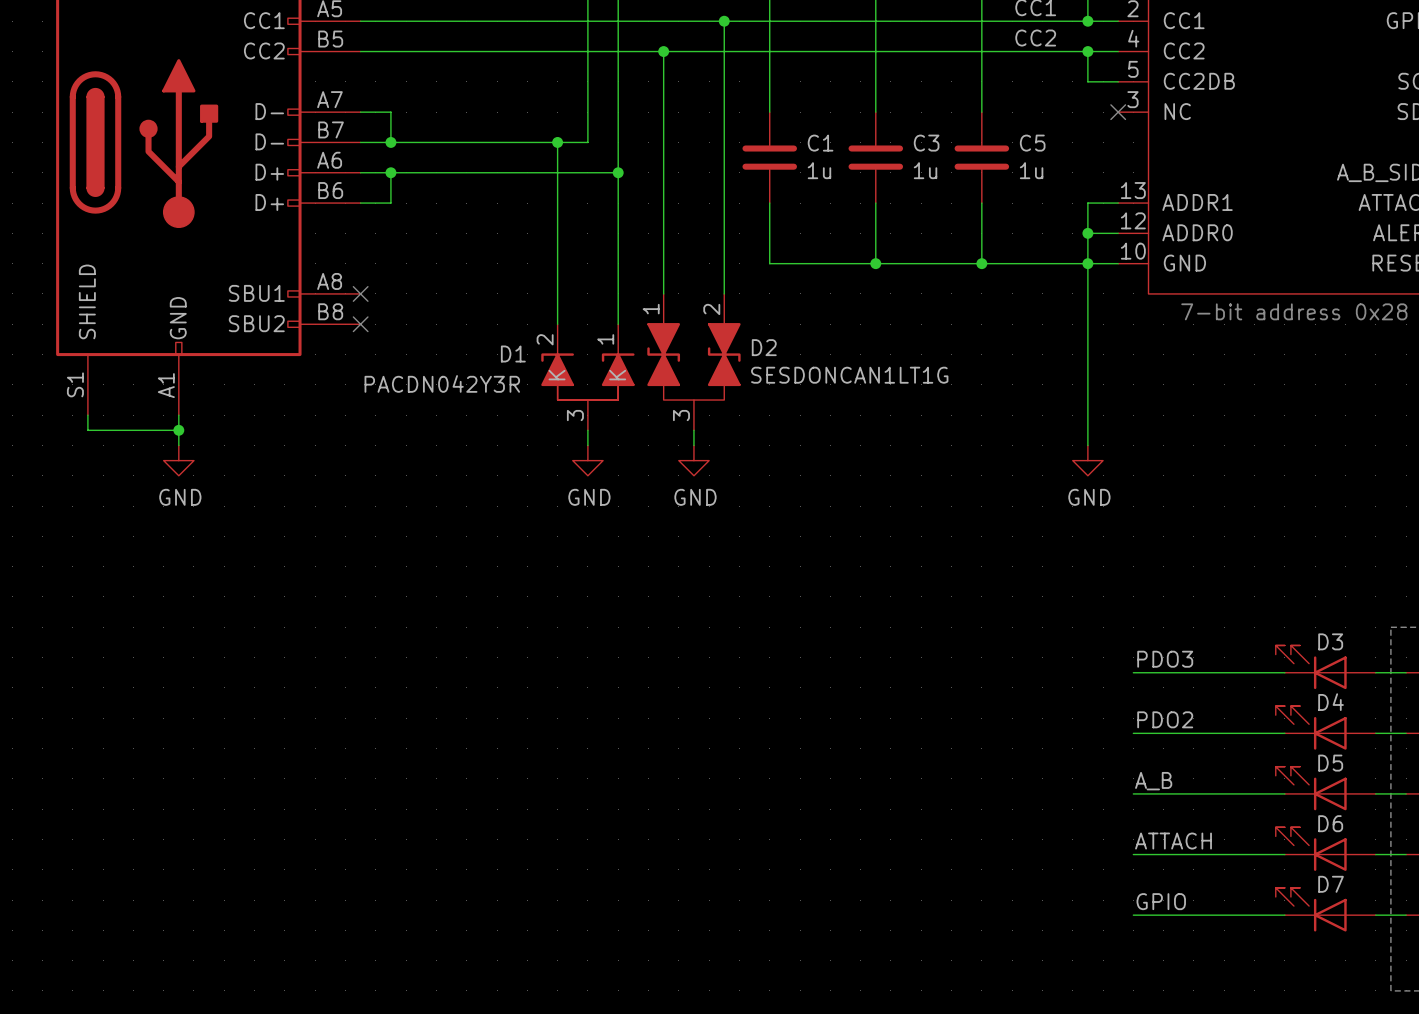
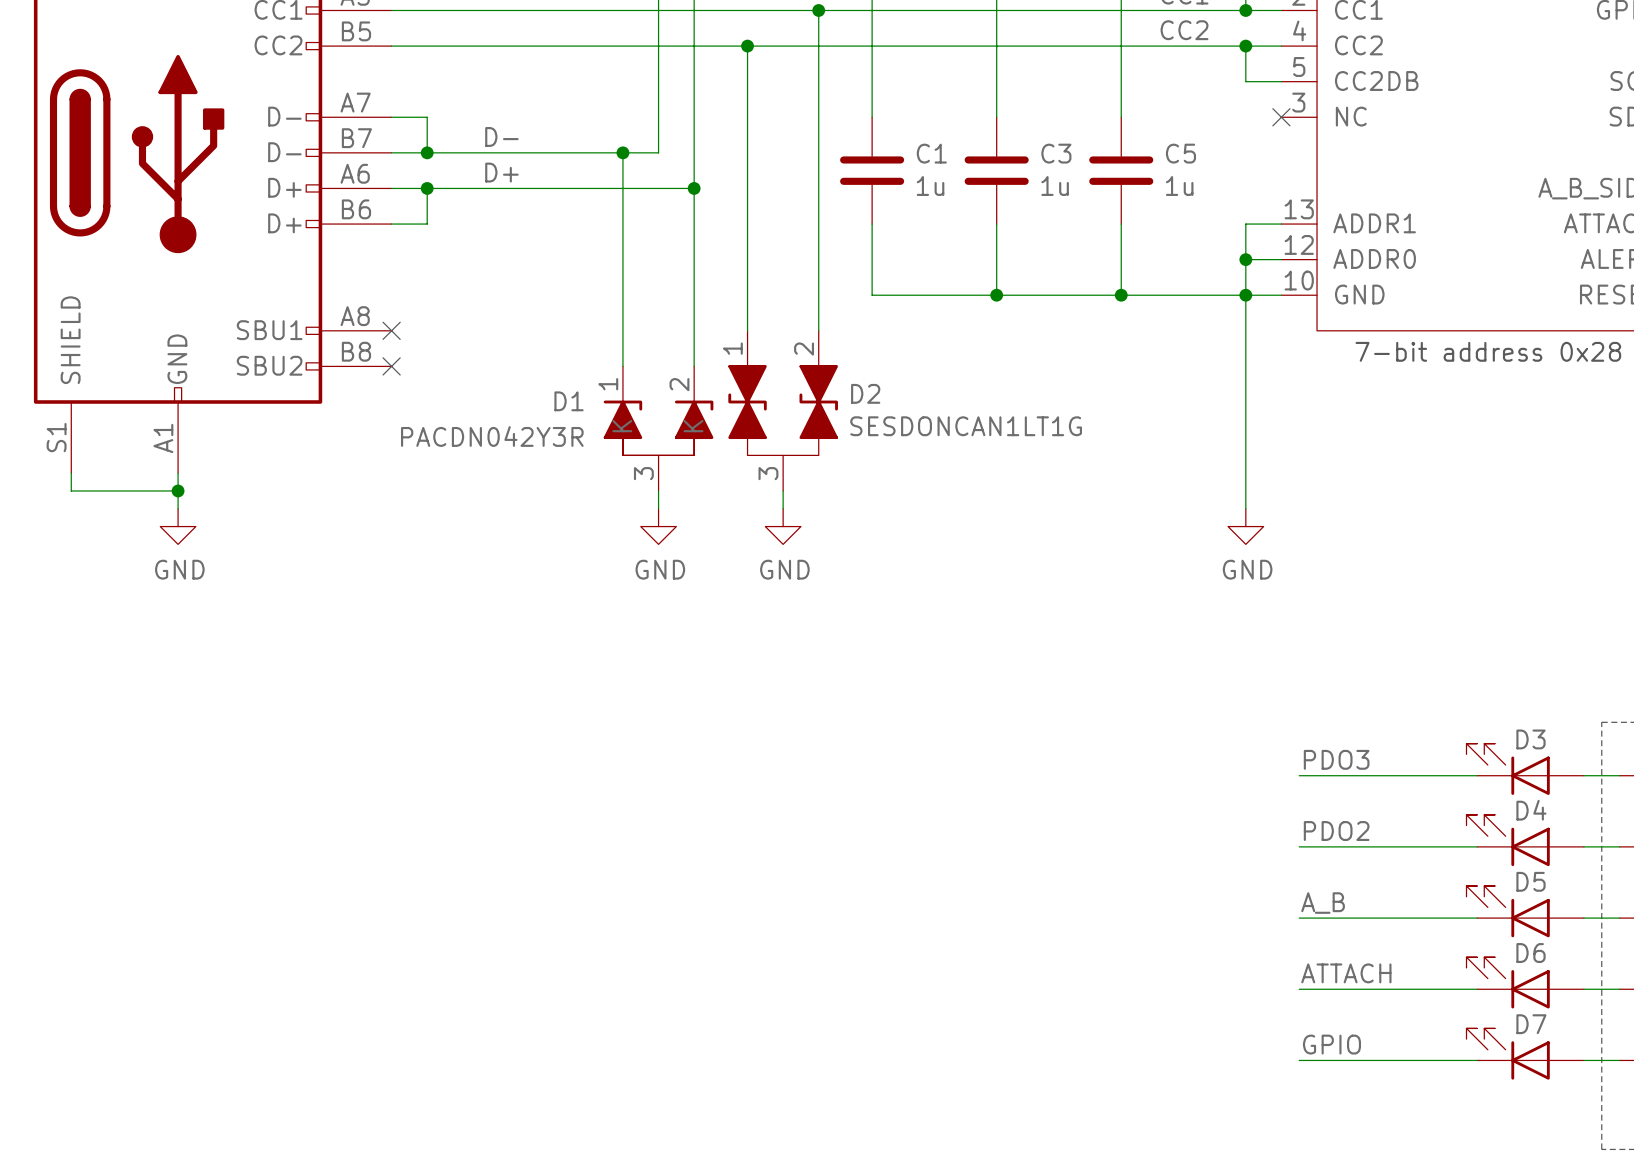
label: none -> D- (501, 136)
label: none -> D+ (501, 172)
D1 flip: as is (587, 376) -> left-right (658, 427)

